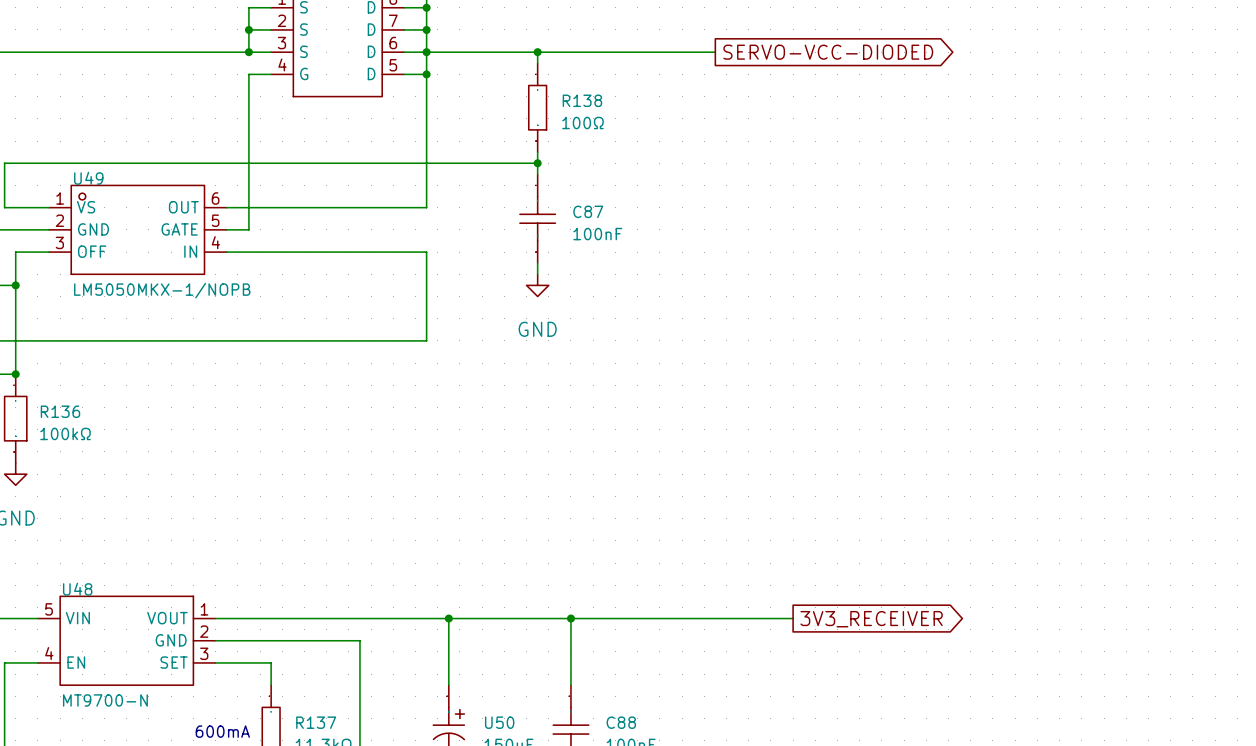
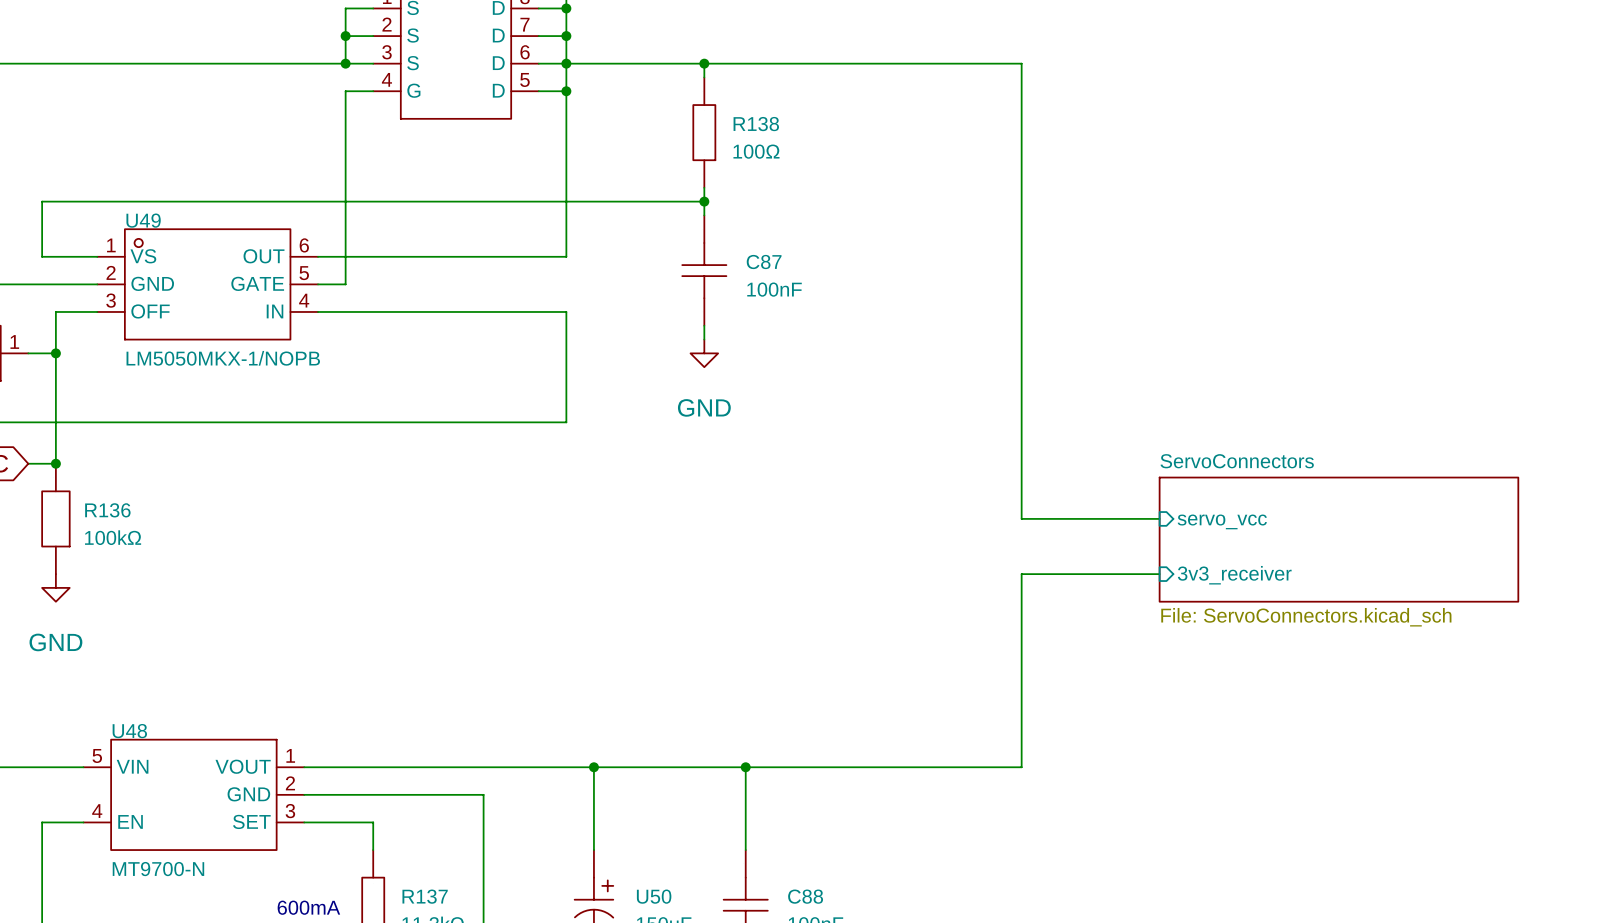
wire: none -> (925, 63) (1021, 63) (1021, 518) (1159, 518)
global label: SERVO-VCC-DIODED (828, 52) -> none
sheet pin: none -> servo_vcc (1222, 521)
sheet ServoConnectors: none -> File: ServoConnectors.kicad_sch (1338, 539)
wire: none -> (1159, 574) (1021, 574) (1021, 767)
sheet pin: none -> 3v3_receiver (1234, 575)
global label: 3V3_RECEIVER (871, 619) -> none

